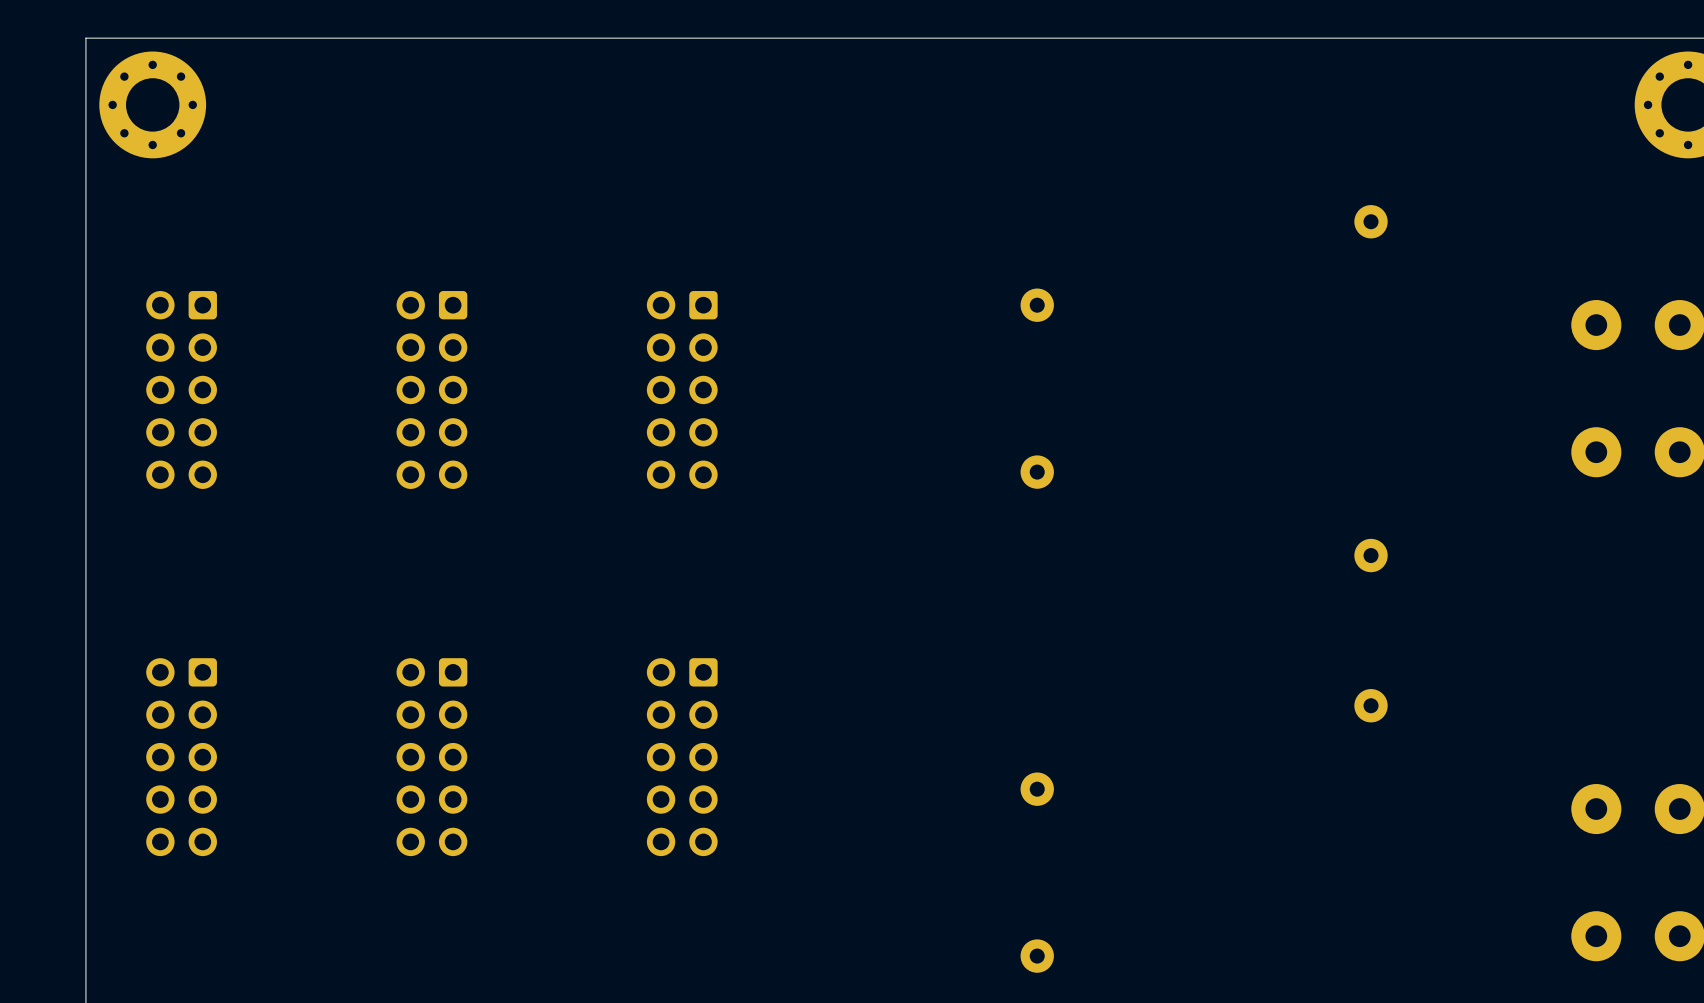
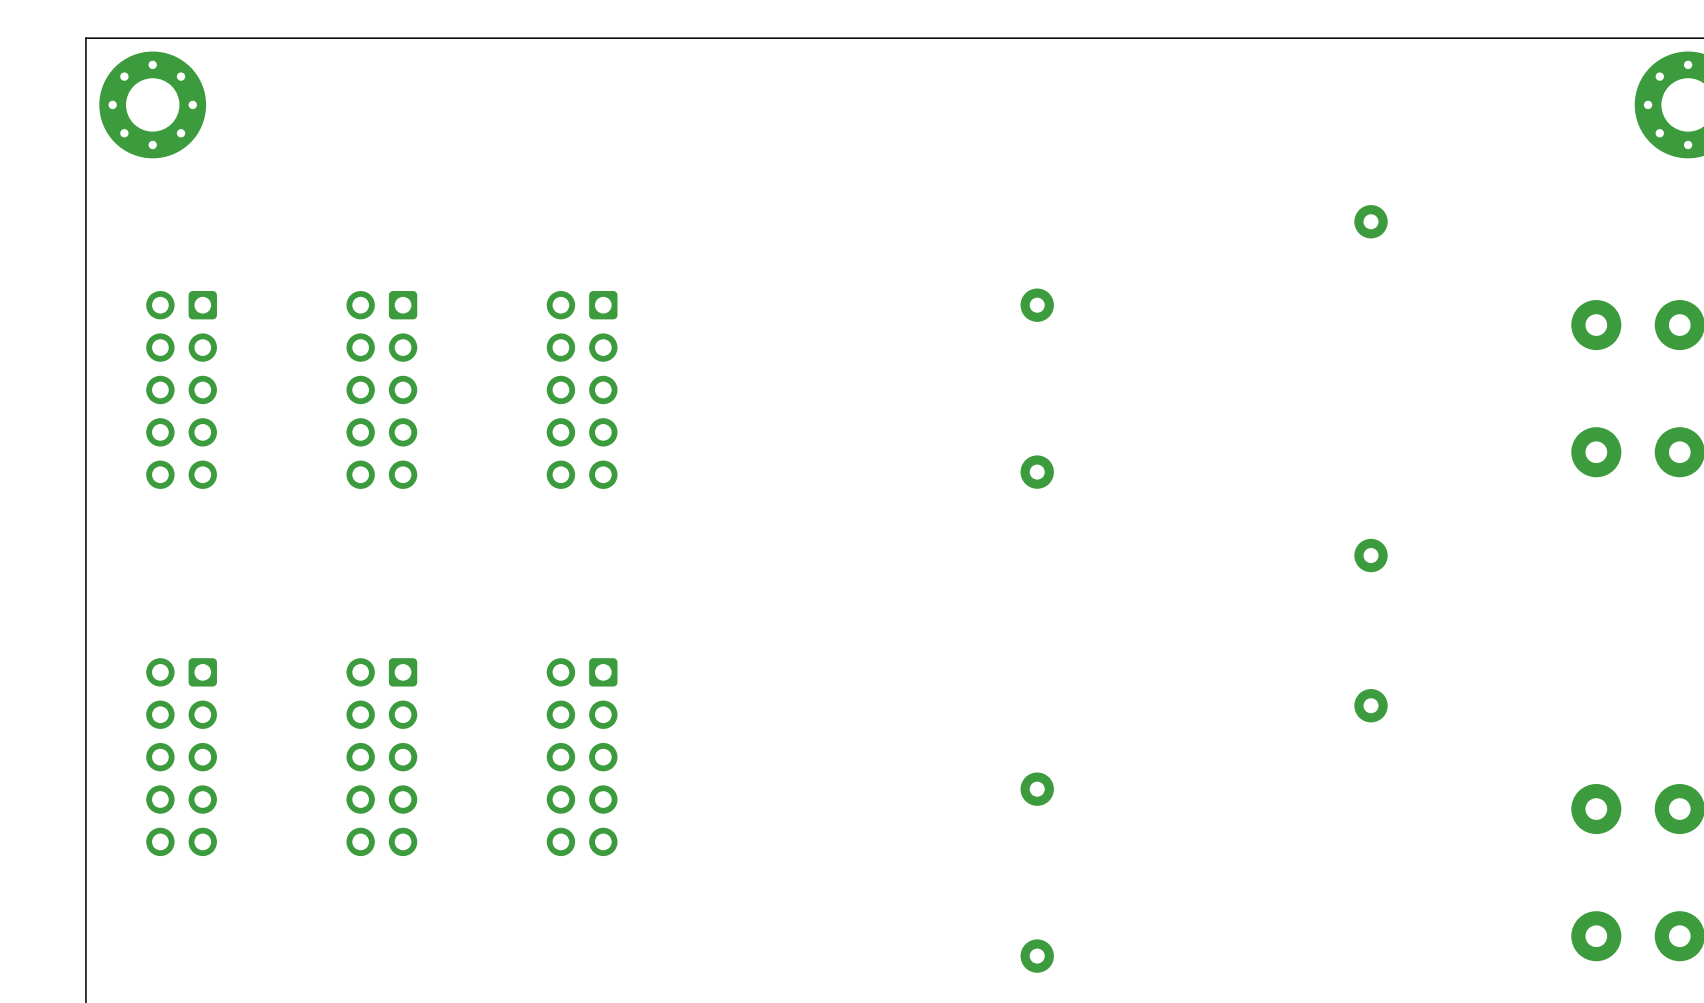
part position: (431, 389) -> (381, 389)
part: none -> (582, 389)
part: (682, 389) -> none
part position: (431, 757) -> (381, 757)
part: none -> (582, 757)
part: (682, 757) -> none

